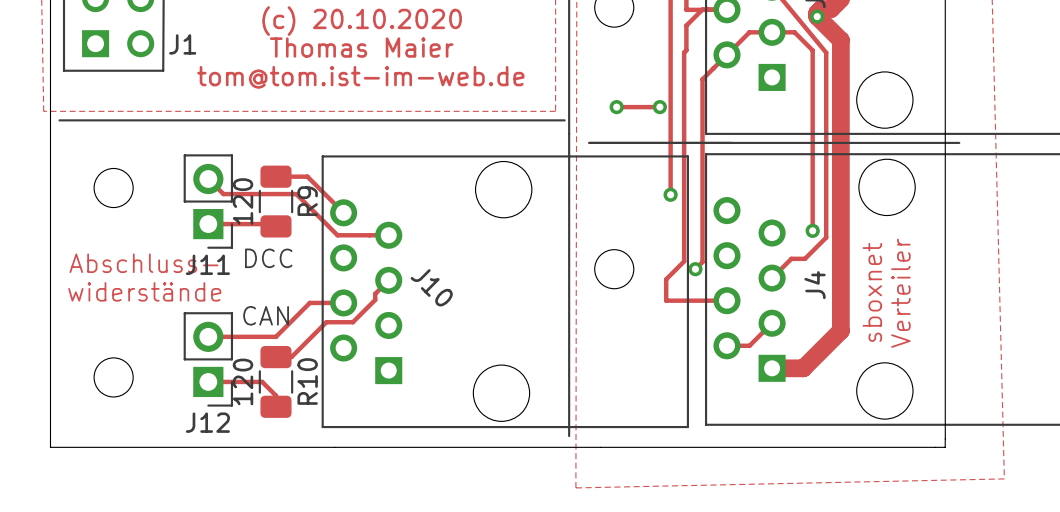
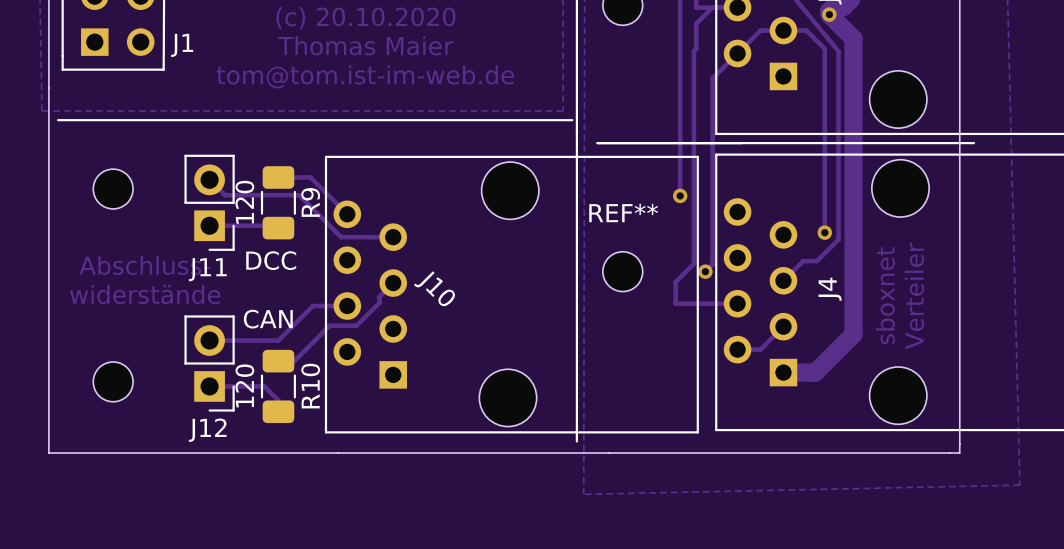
track: (616, 107) (659, 107) -> none
via: (616, 107) -> none
via: (659, 107) -> none
REF** name: none -> REF** (623, 212)

